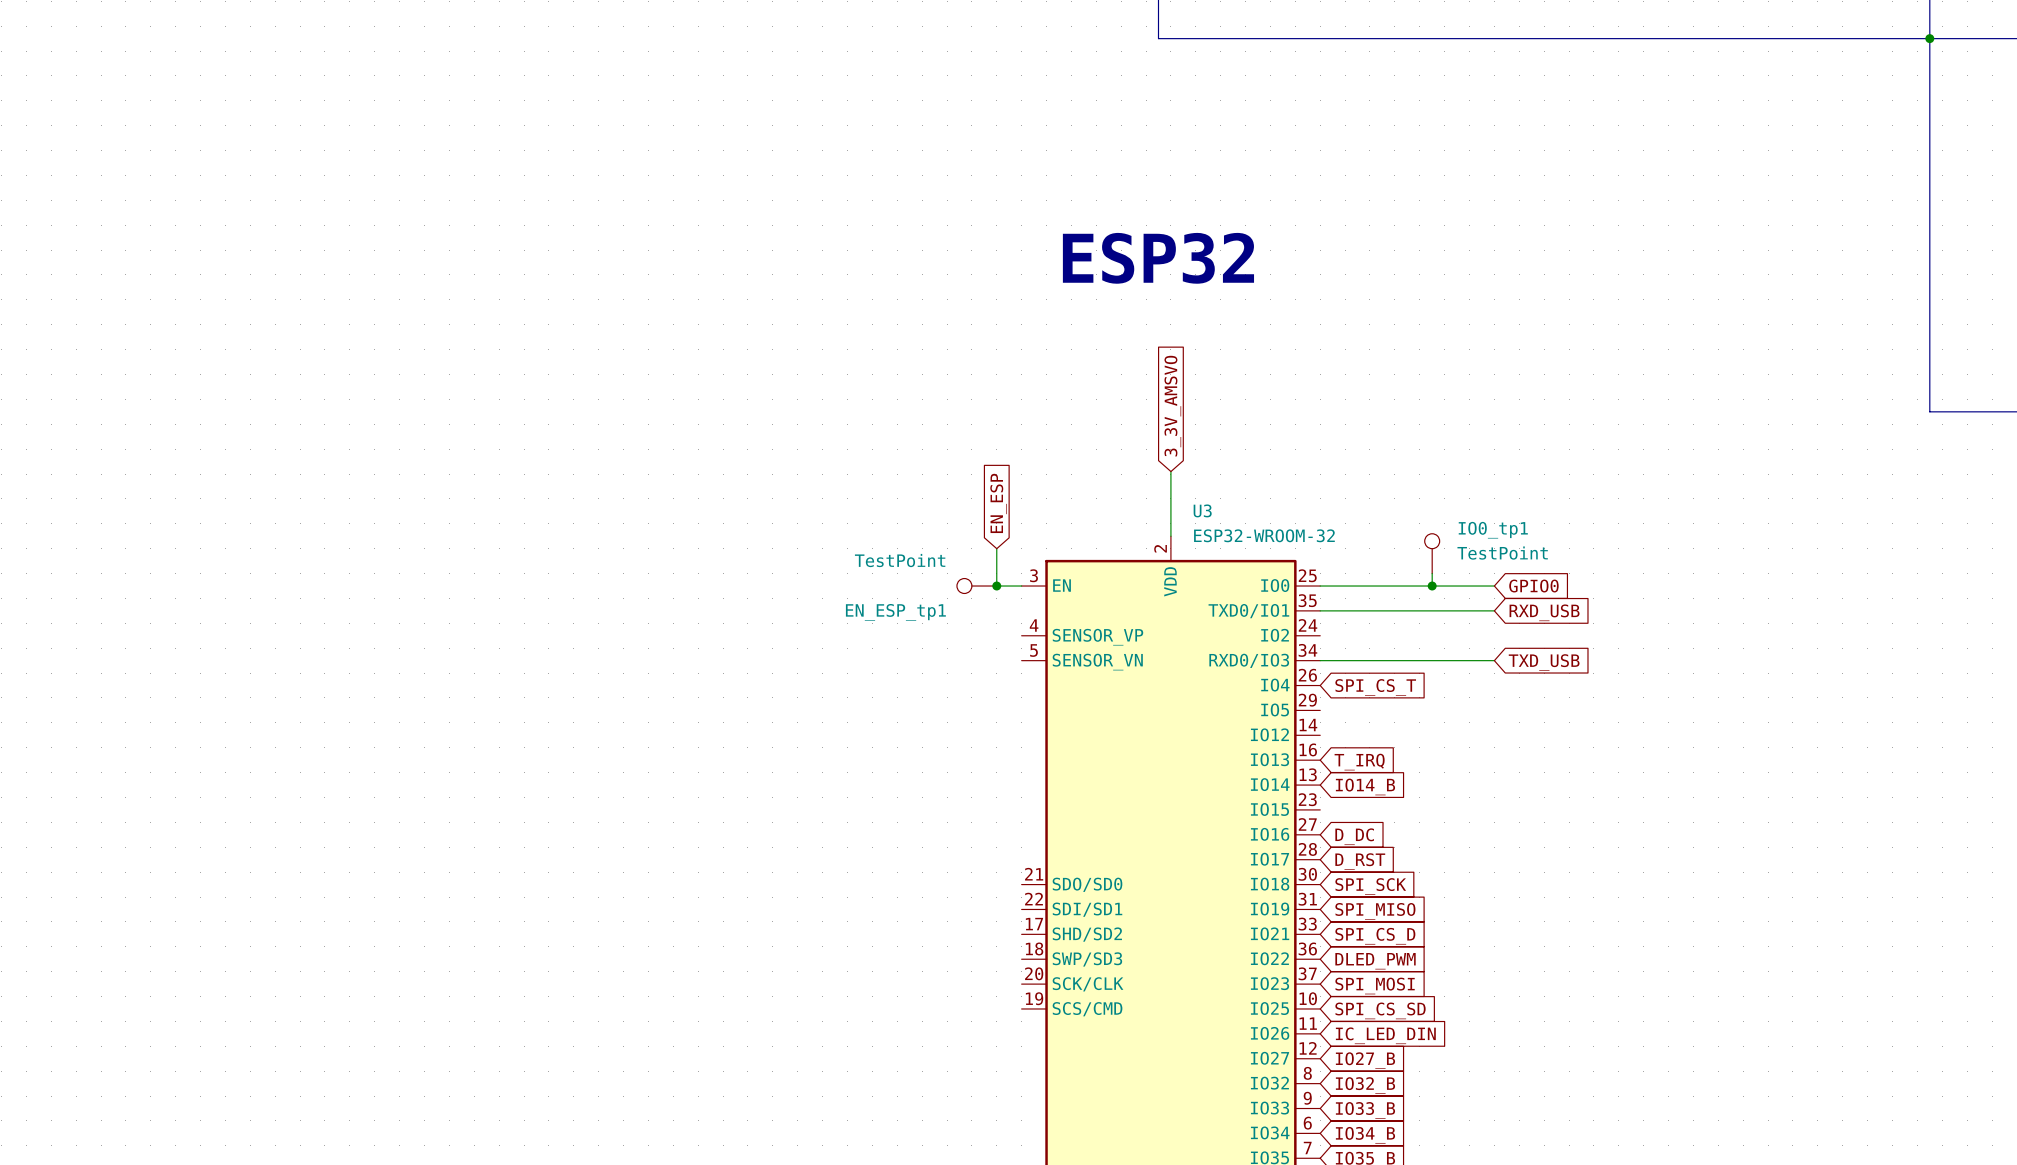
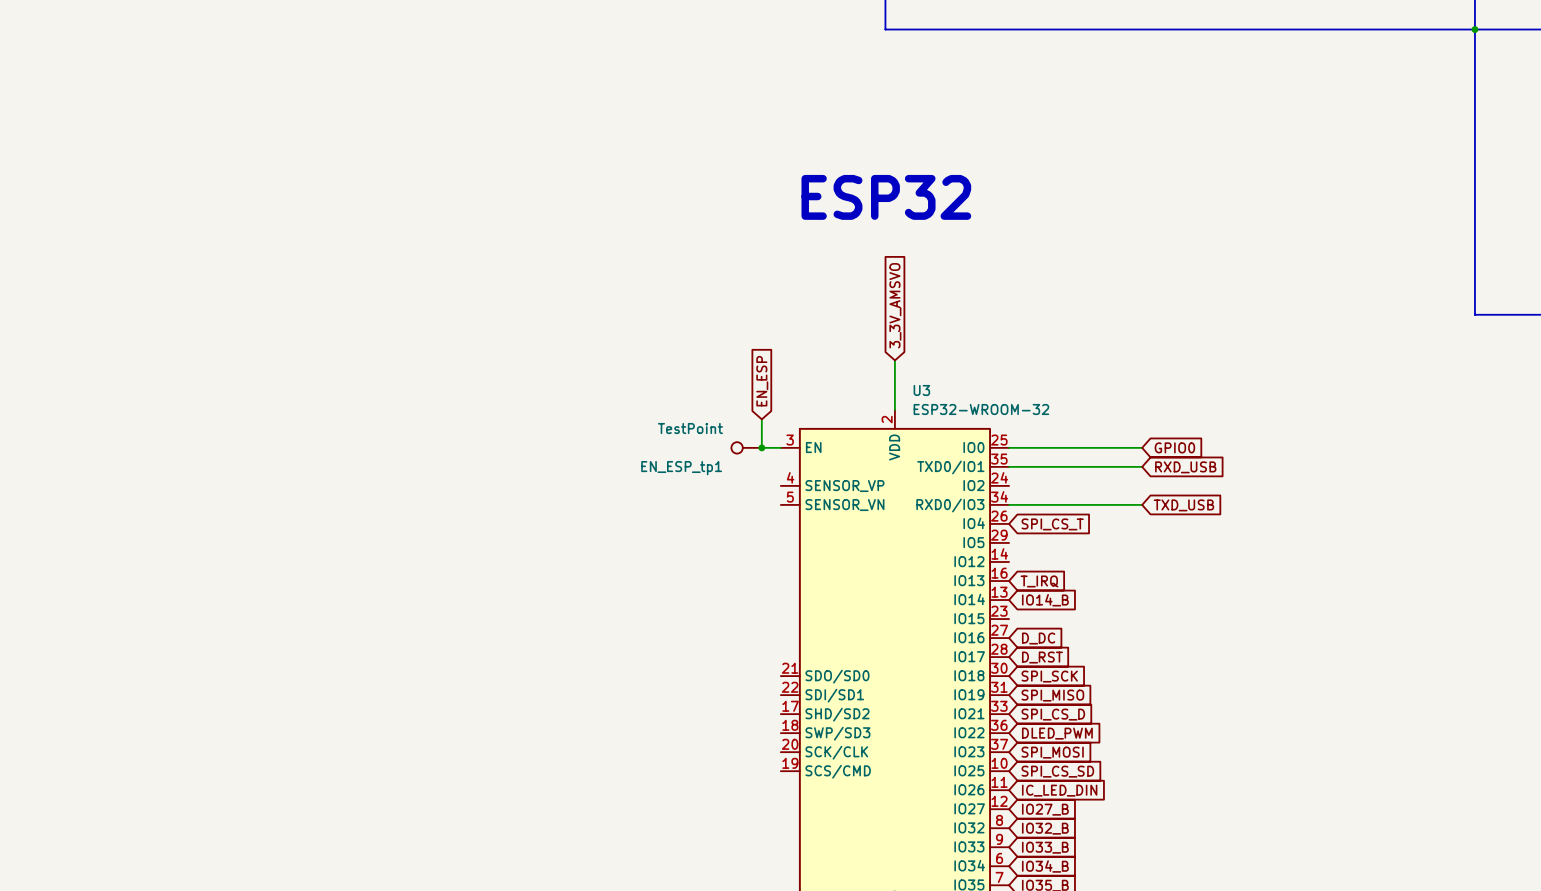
IO0_tp1: TestPoint (1432, 553) -> none
wire: (1432, 573) (1432, 586) -> none
junction: (1432, 586) -> none

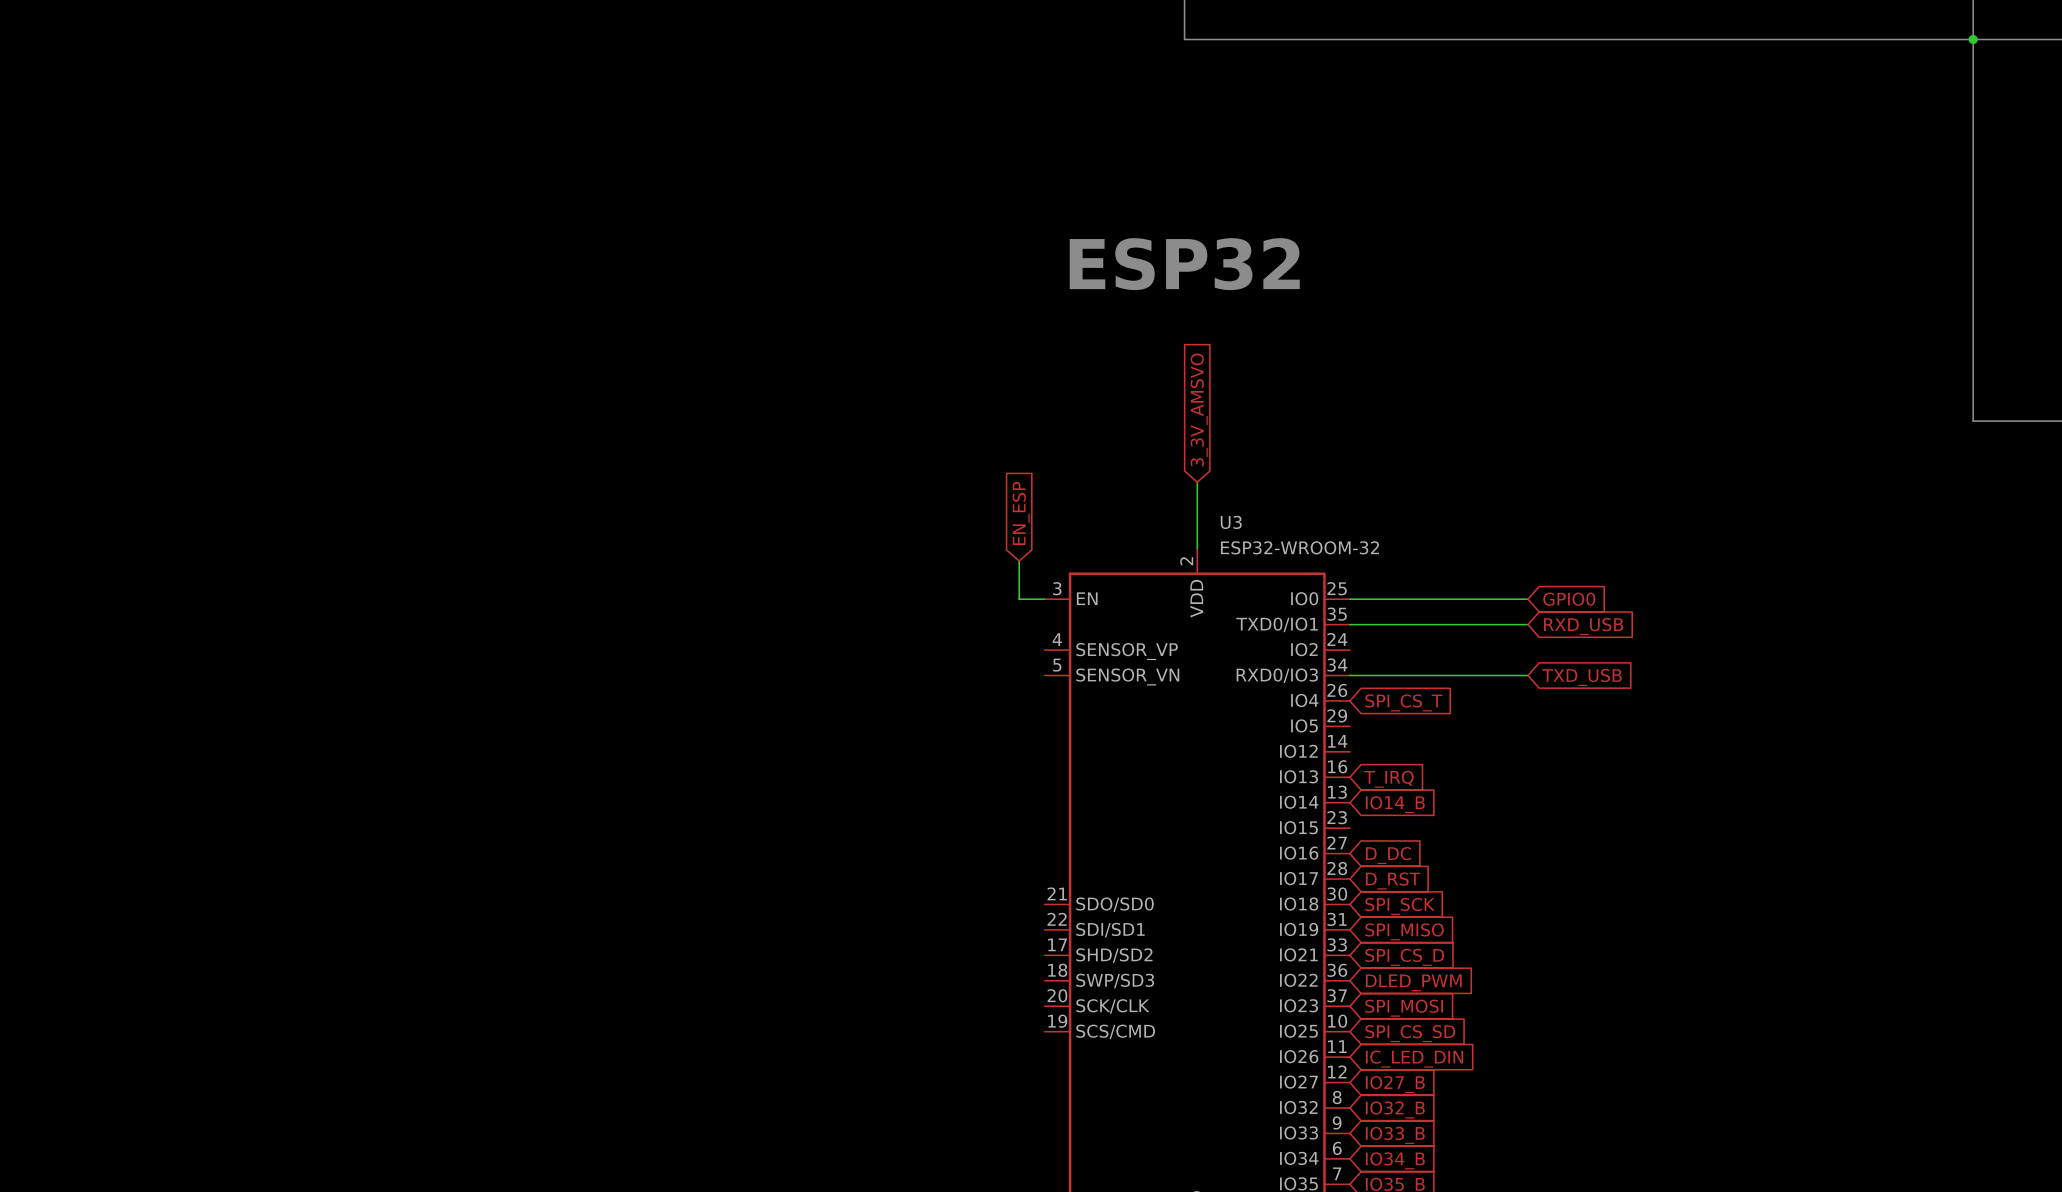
EN_ESP_tp1: TestPoint (746, 447) -> none
junction: (761, 447) -> none

